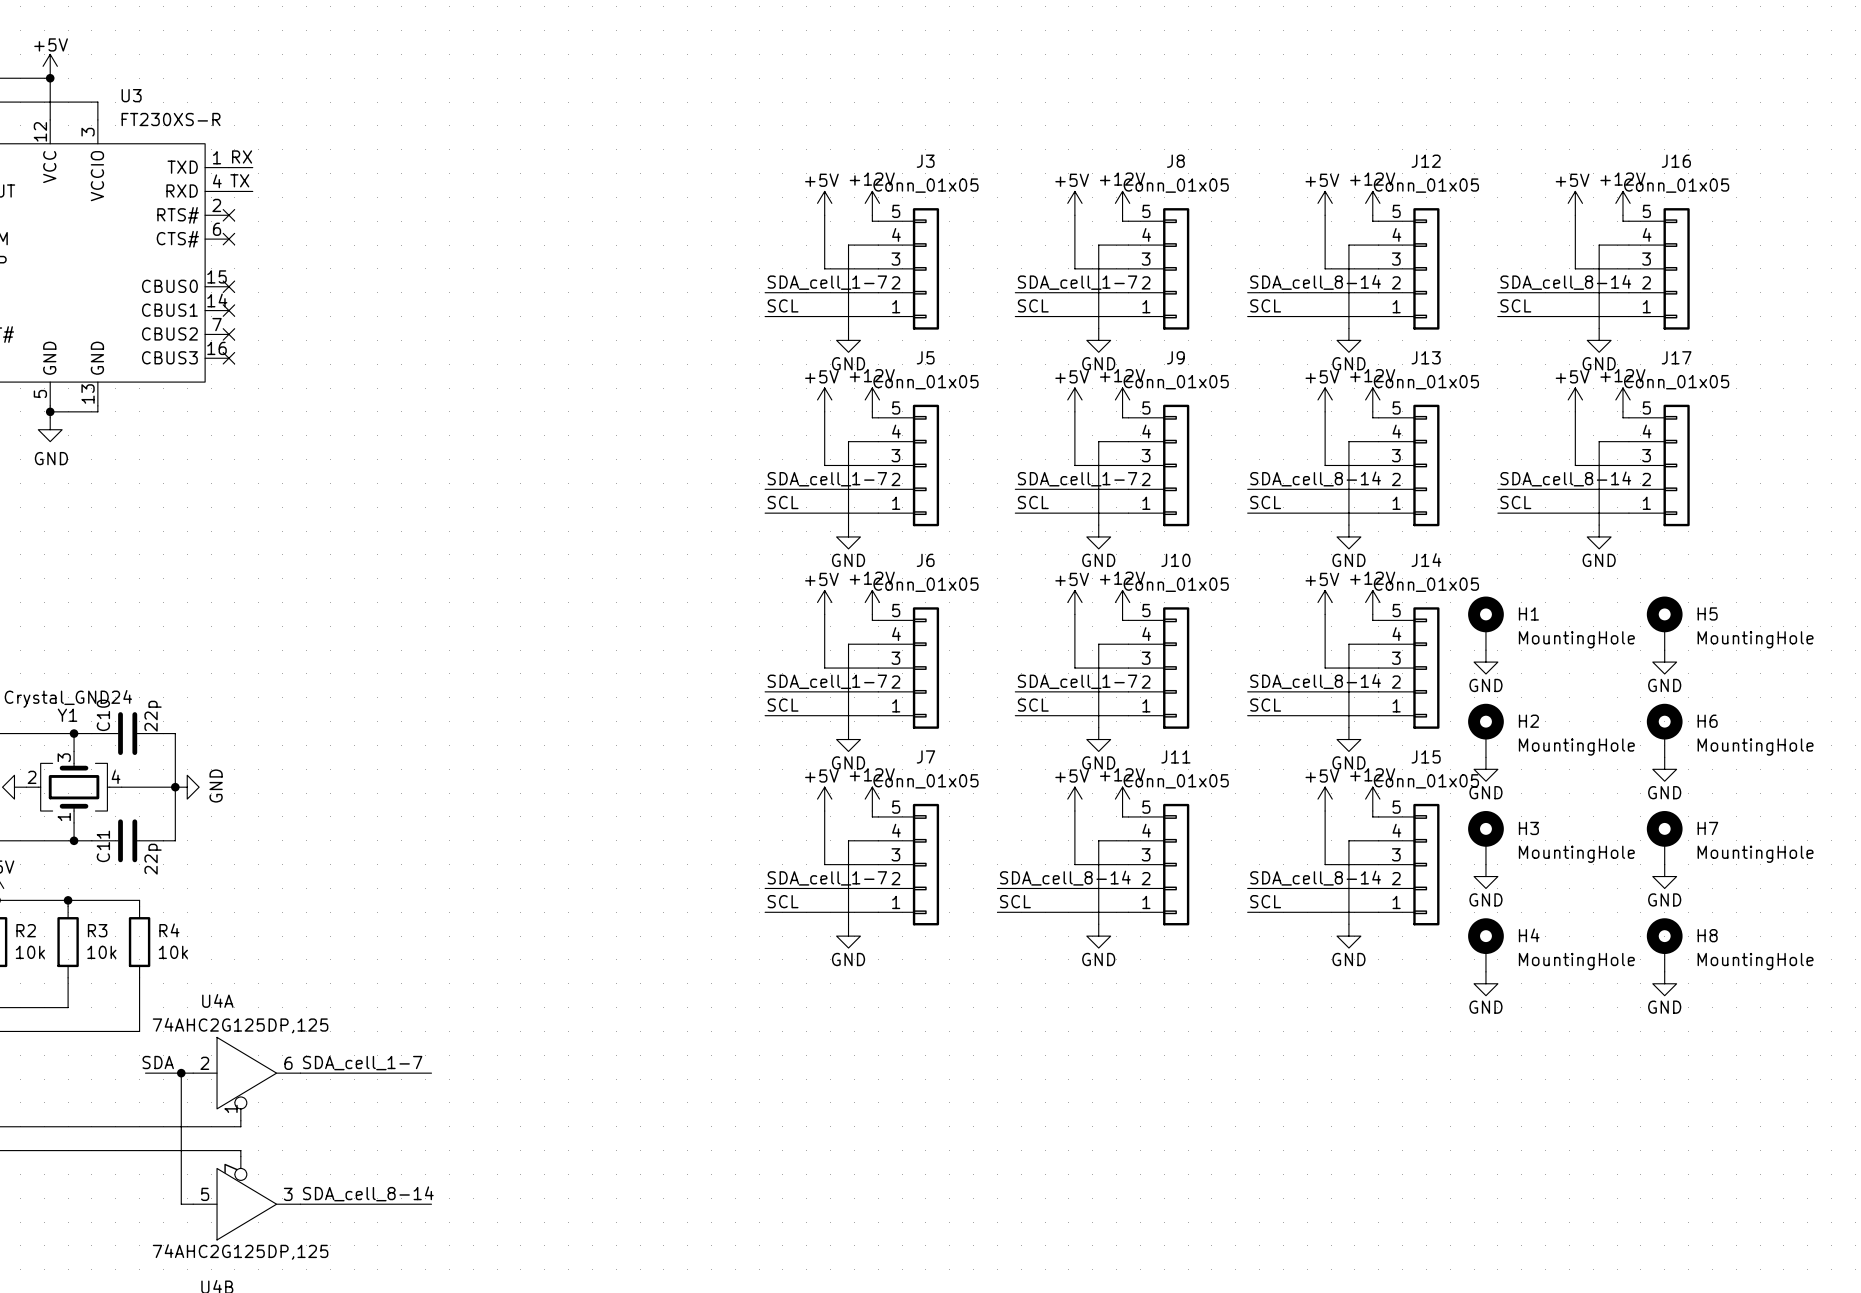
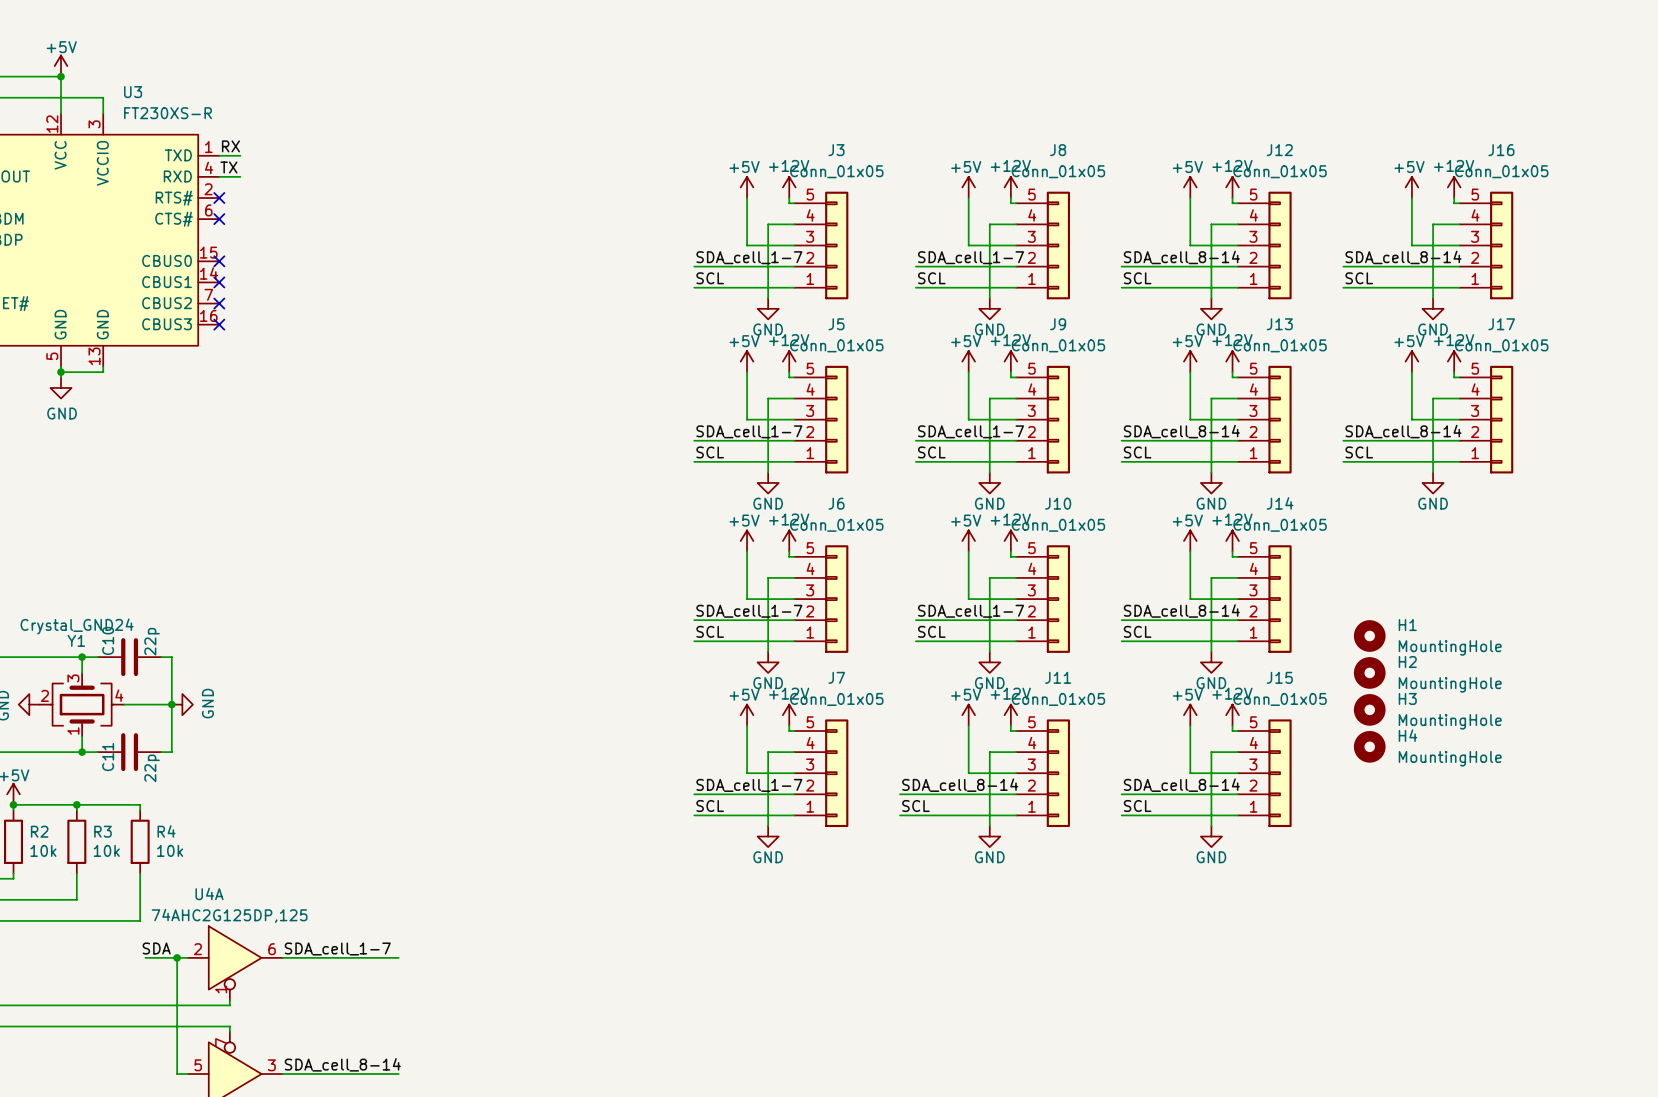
H1 symbol: [1468, 596, 1504, 651] -> [1353, 620, 1386, 652]
H5: MountingHole (1664, 623) -> none
power symbol: GND (1485, 662) -> none
power symbol: GND (1664, 662) -> none
H2 symbol: [1468, 703, 1504, 758] -> [1353, 657, 1386, 689]
H6: MountingHole (1664, 730) -> none
power symbol: GND (1485, 769) -> none
power symbol: GND (1664, 769) -> none
H3 symbol: [1468, 811, 1504, 865] -> [1353, 694, 1386, 726]
H7: MountingHole (1664, 837) -> none
power symbol: GND (1485, 876) -> none
power symbol: GND (1664, 876) -> none
H4 symbol: [1468, 918, 1504, 972] -> [1353, 730, 1386, 763]
H8: MountingHole (1664, 945) -> none
power symbol: GND (1485, 983) -> none
power symbol: GND (1664, 983) -> none

